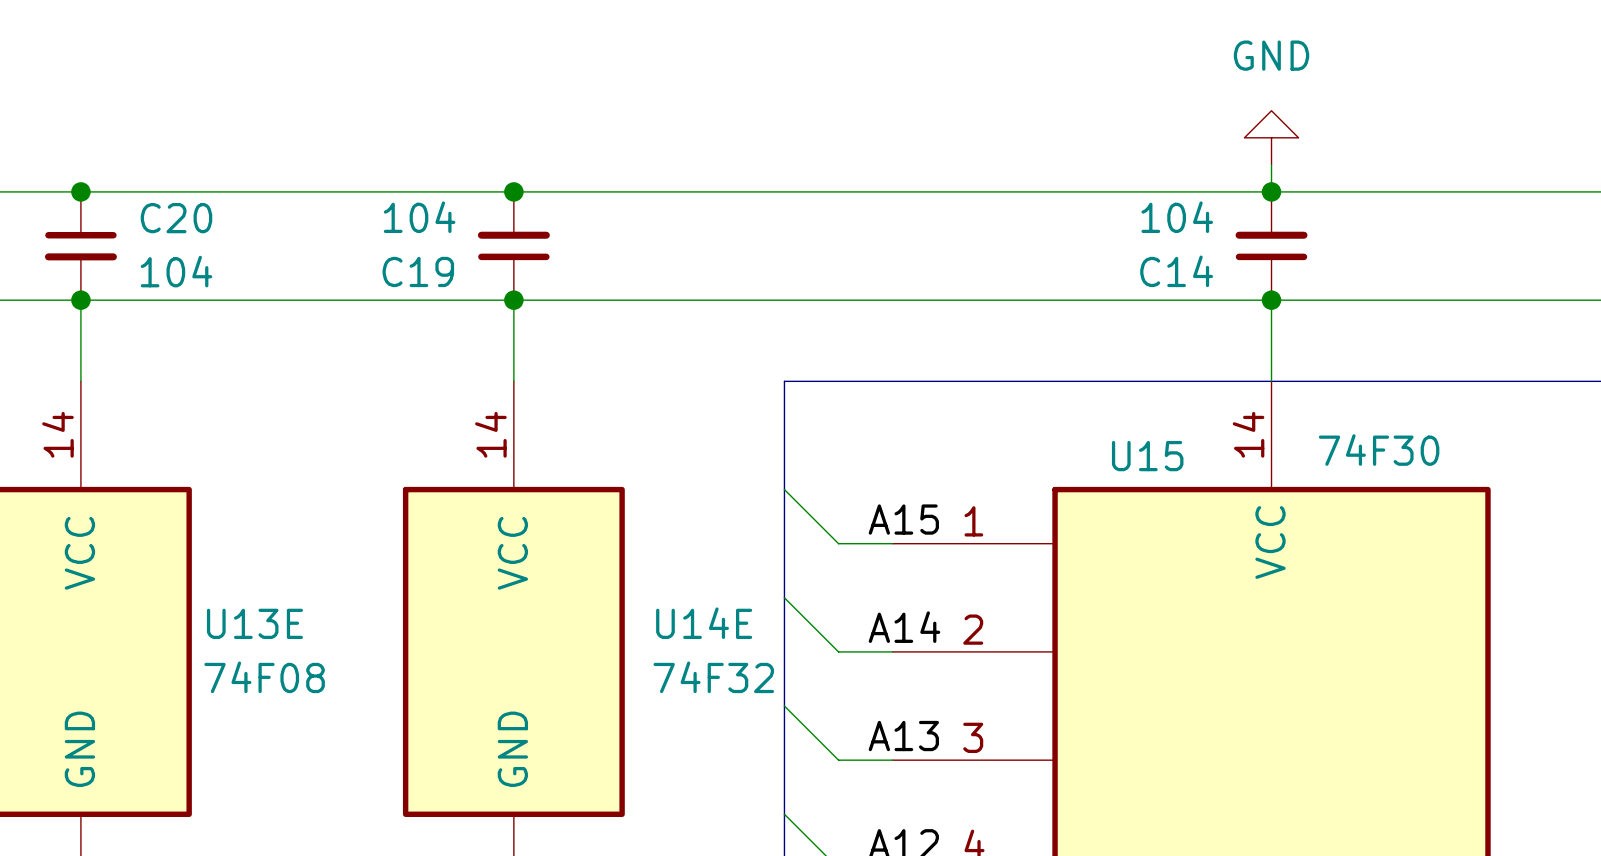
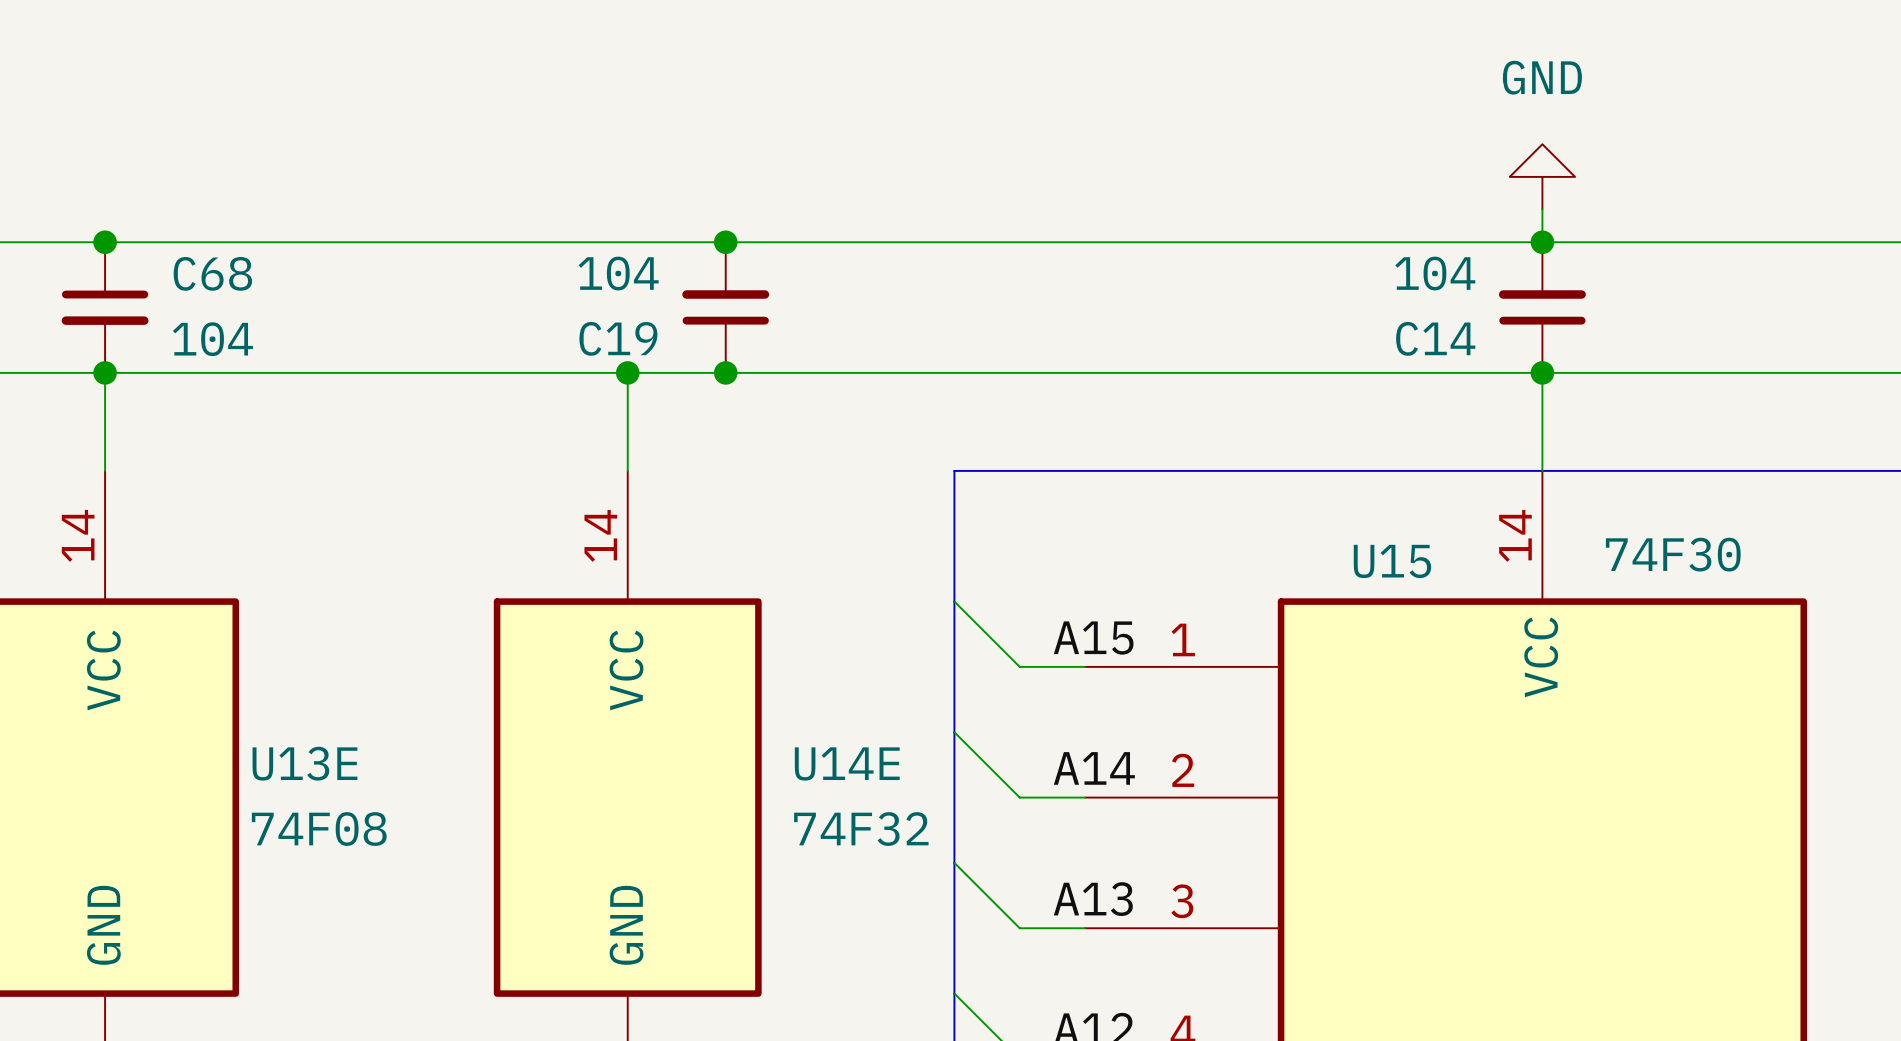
junction: (513, 191) -> none
junction: none -> (725, 242)
C20 name: C20 (176, 218) -> C68 (212, 273)
C19 position: (513, 246) -> (725, 307)
junction: none -> (725, 372)

